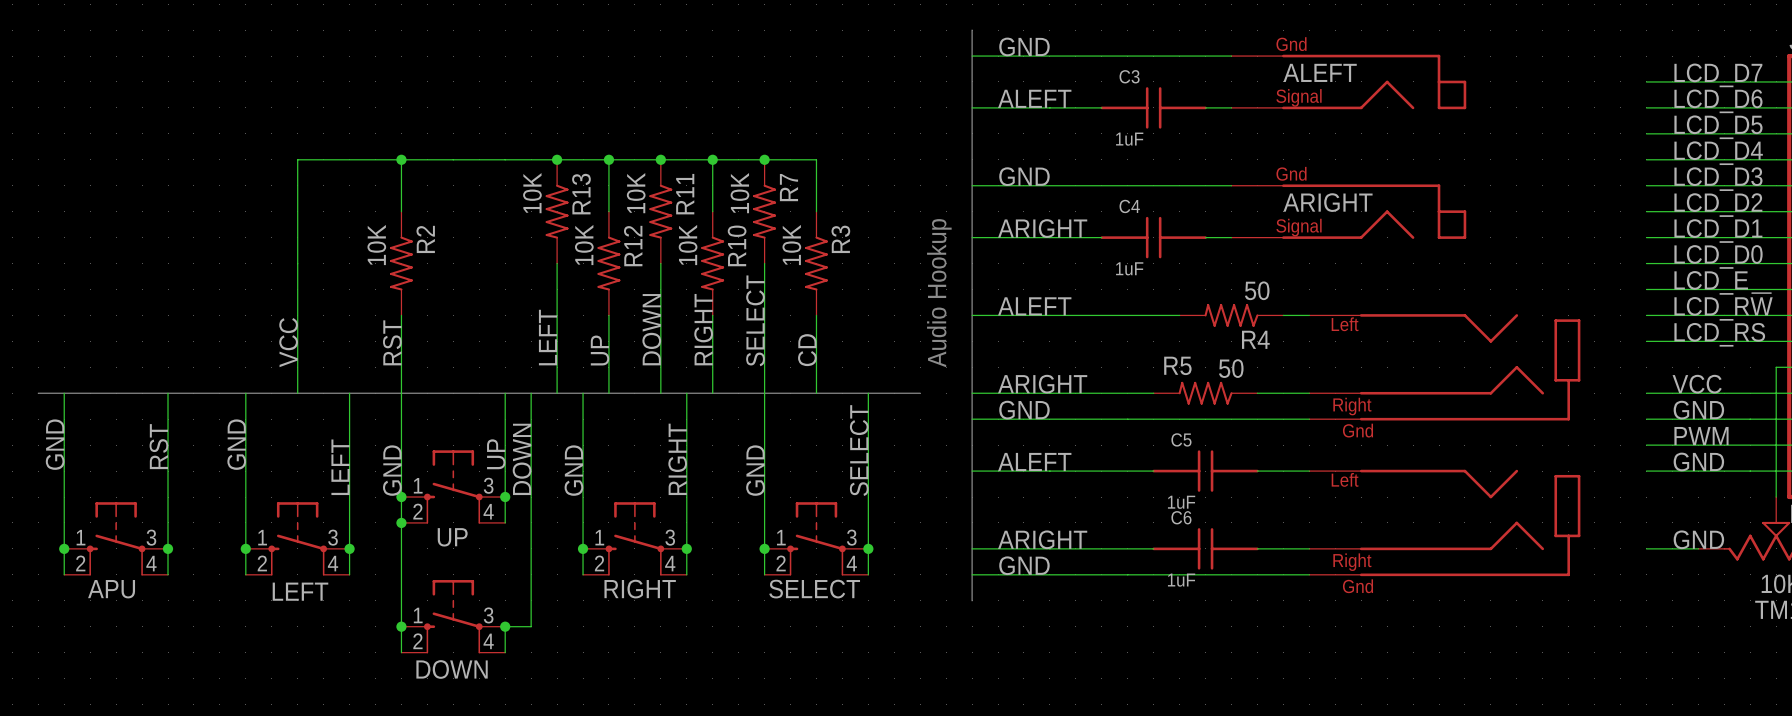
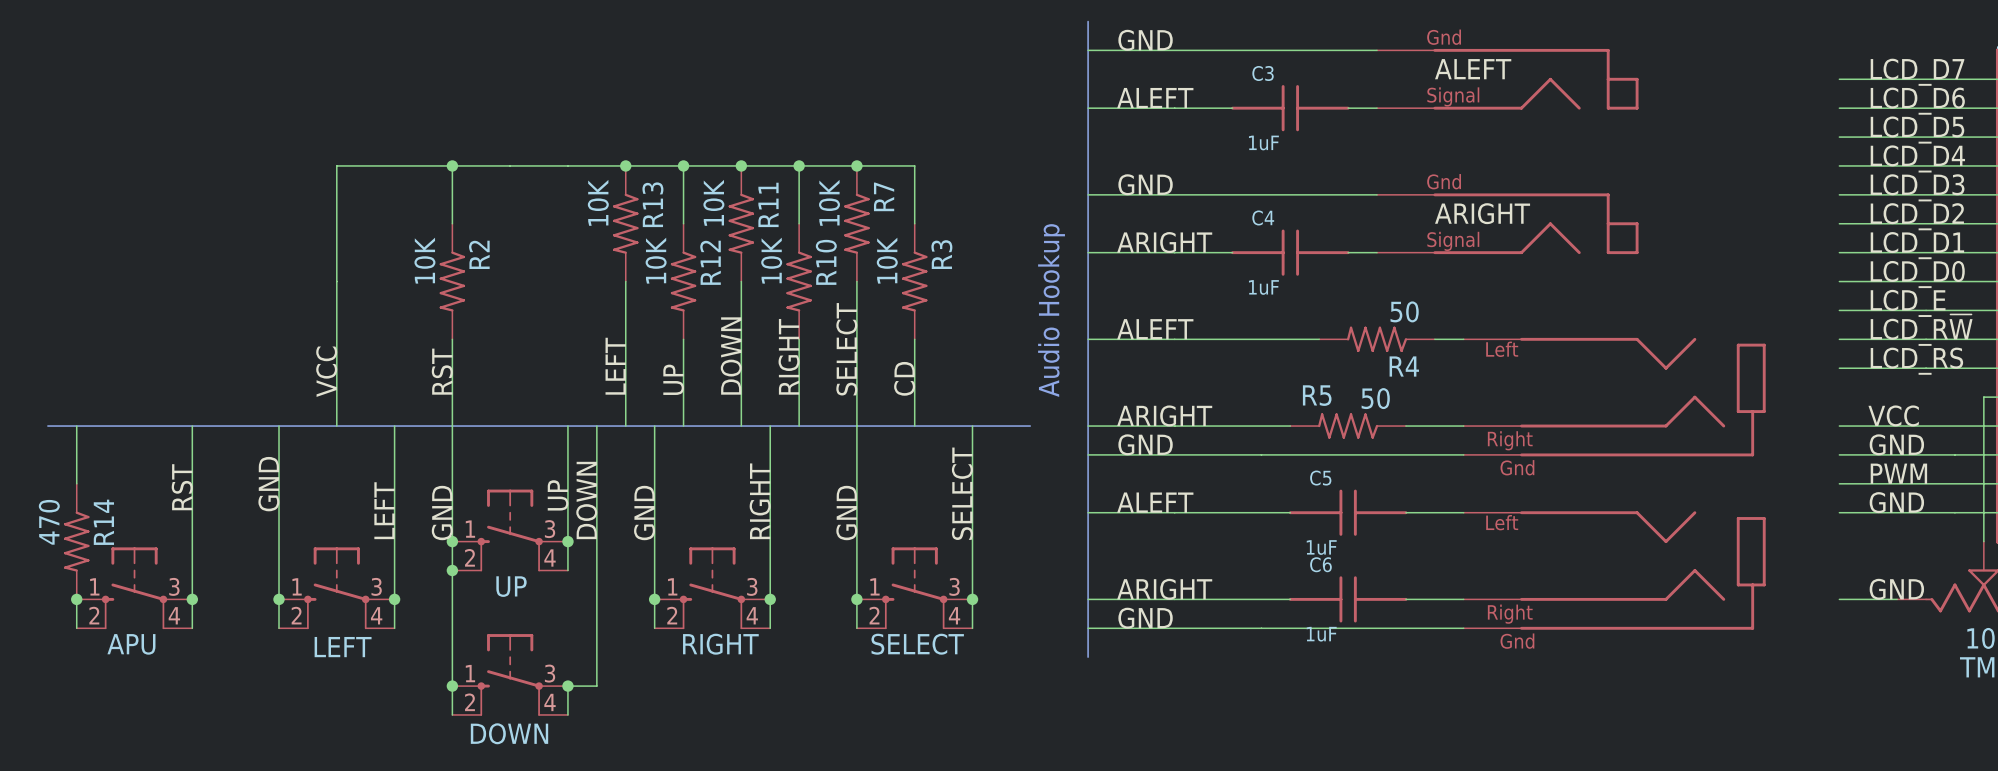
label: GND (55, 444) -> none
R14: none -> 470 (76, 541)

